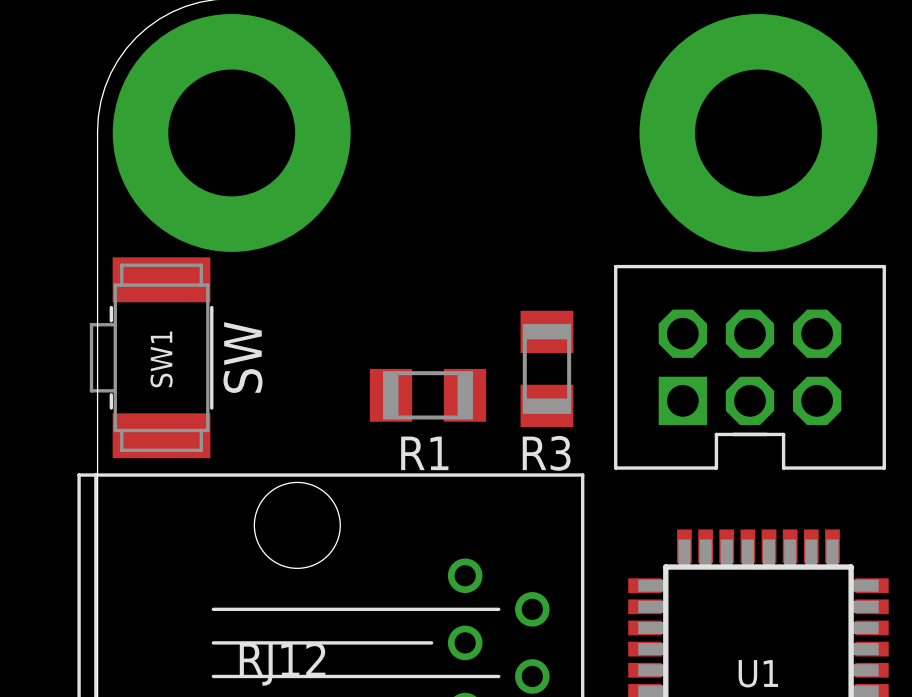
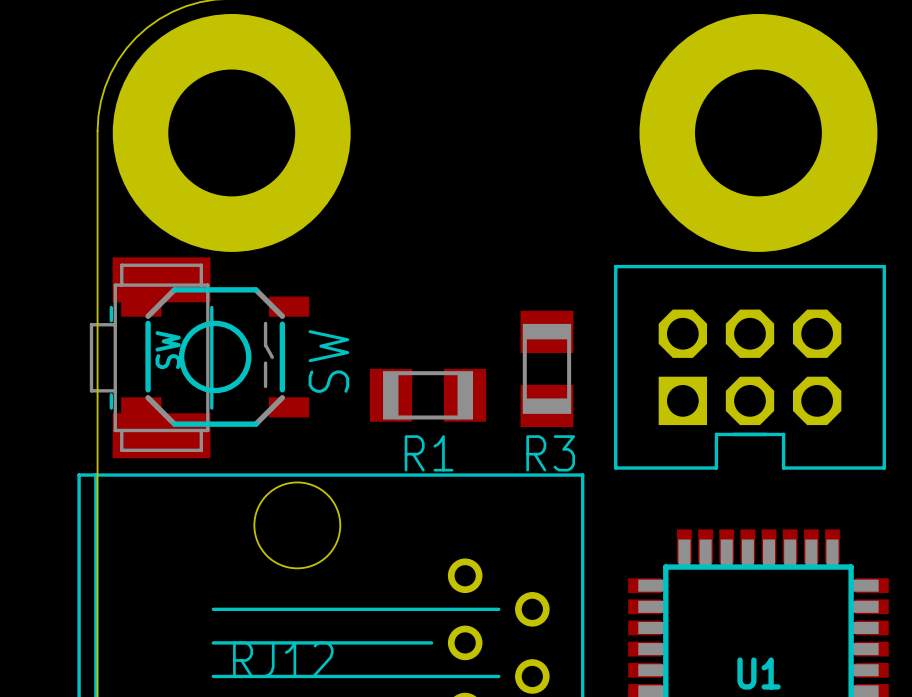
part: none -> (215, 357)
text position: SW (242, 357) -> SW (328, 361)
SW1 name: SW1 (161, 359) -> SW (168, 350)

